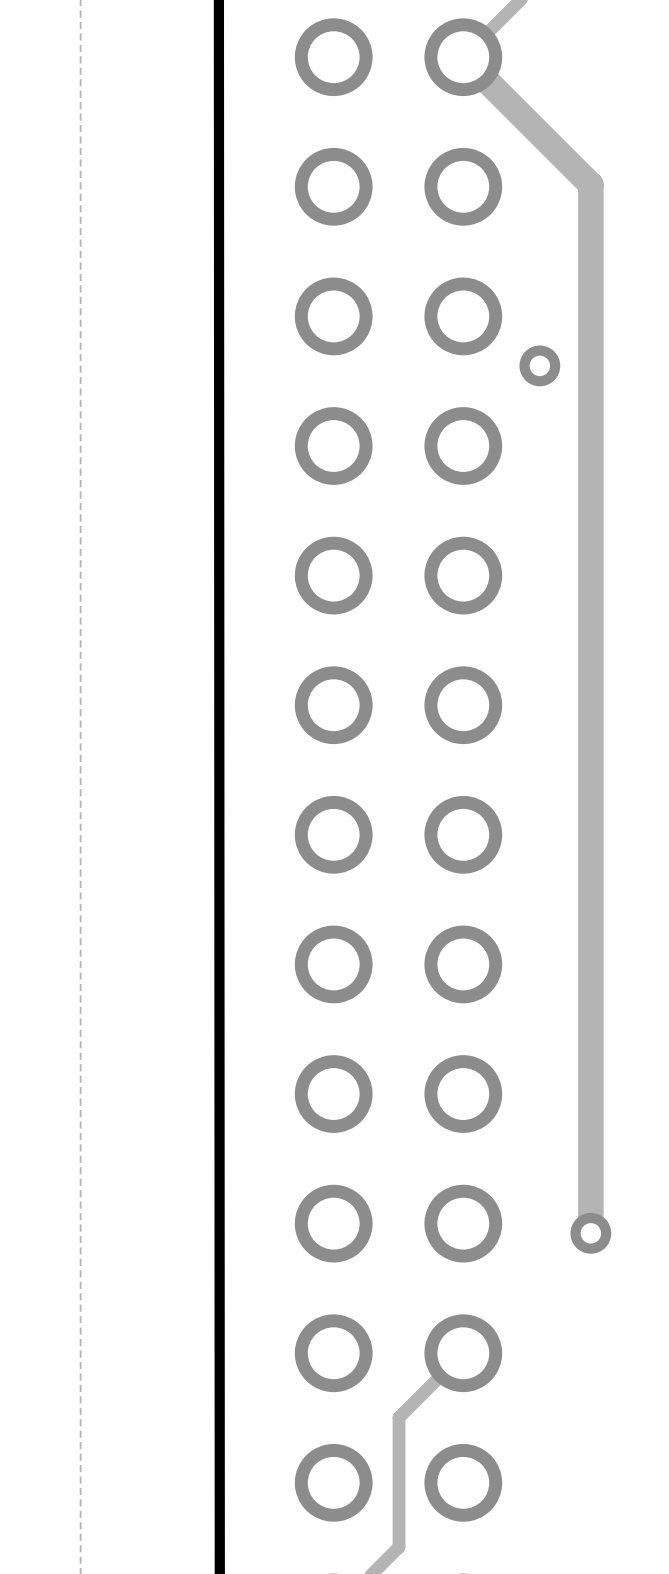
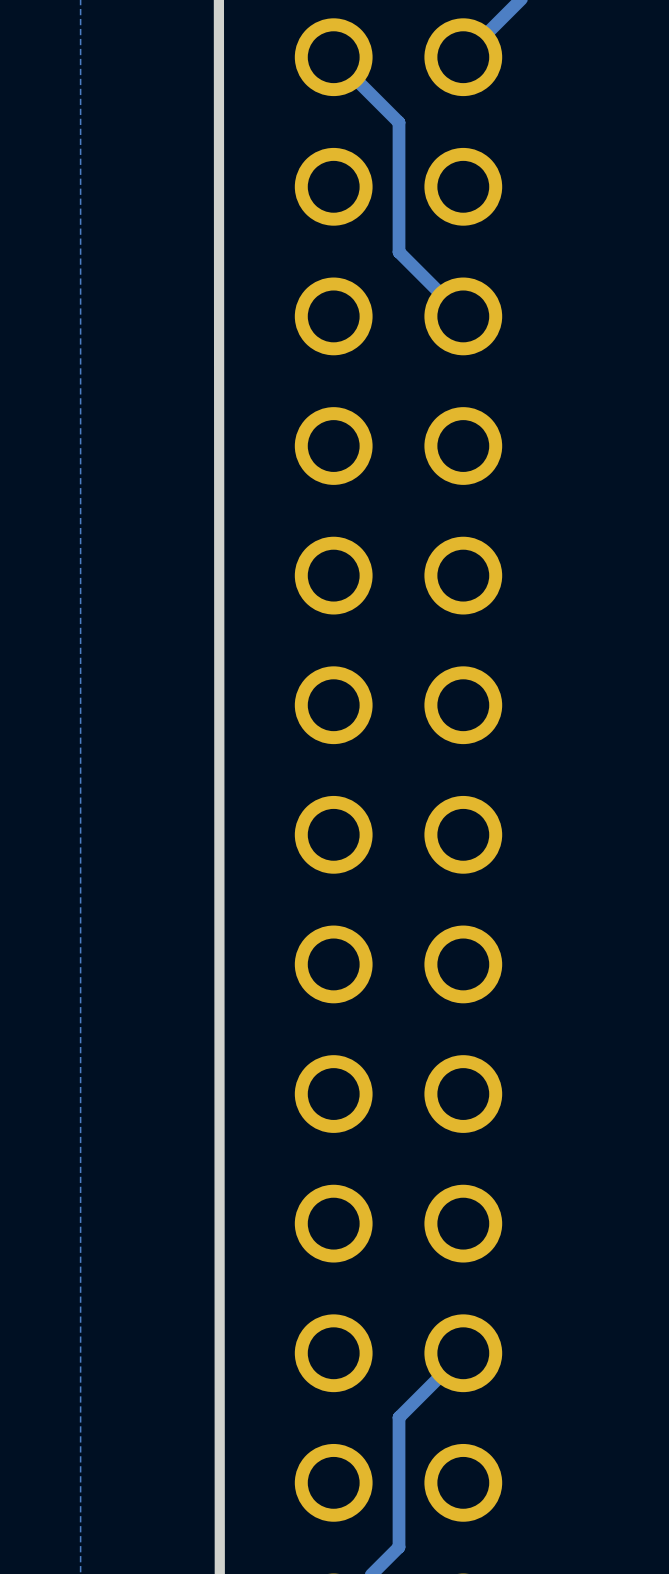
track: none -> (333, 57) (399, 122) (399, 252) (463, 316)
track: (463, 57) (590, 184) (590, 1233) -> none
via: (539, 365) -> none
via: (590, 1233) -> none

